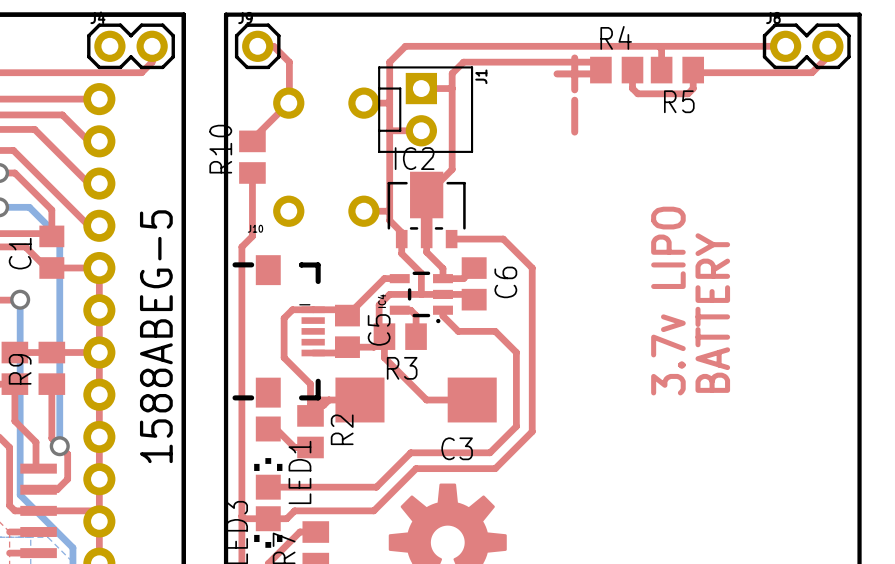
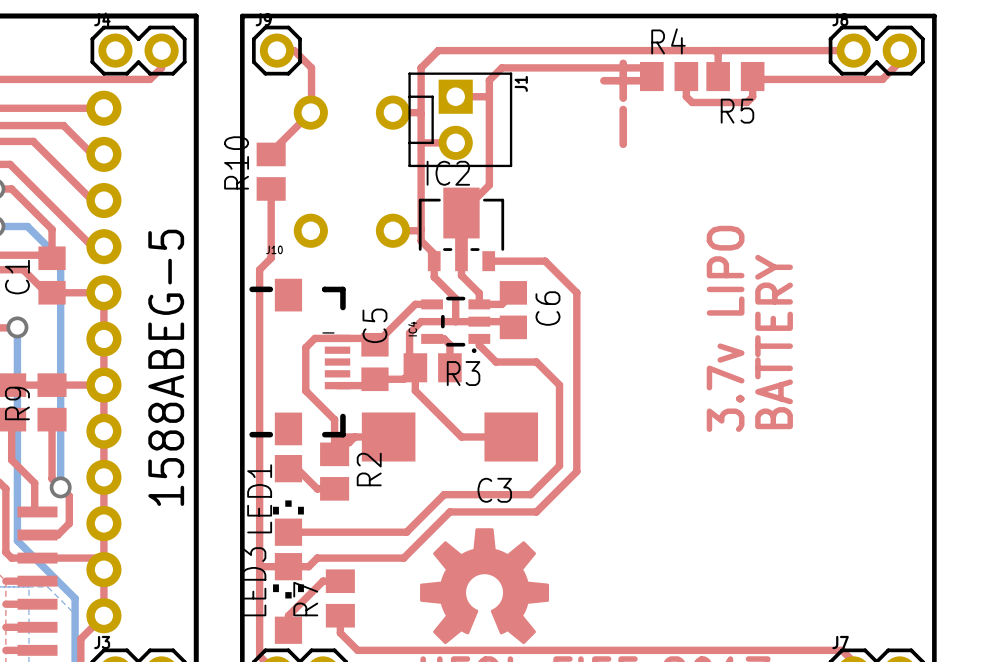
C5 name position: C5 (379, 329) -> C5 (374, 325)
R3 name position: R3 (402, 368) -> R3 (463, 373)
LED1 name position: LED1 (299, 472) -> LED1 (259, 498)

